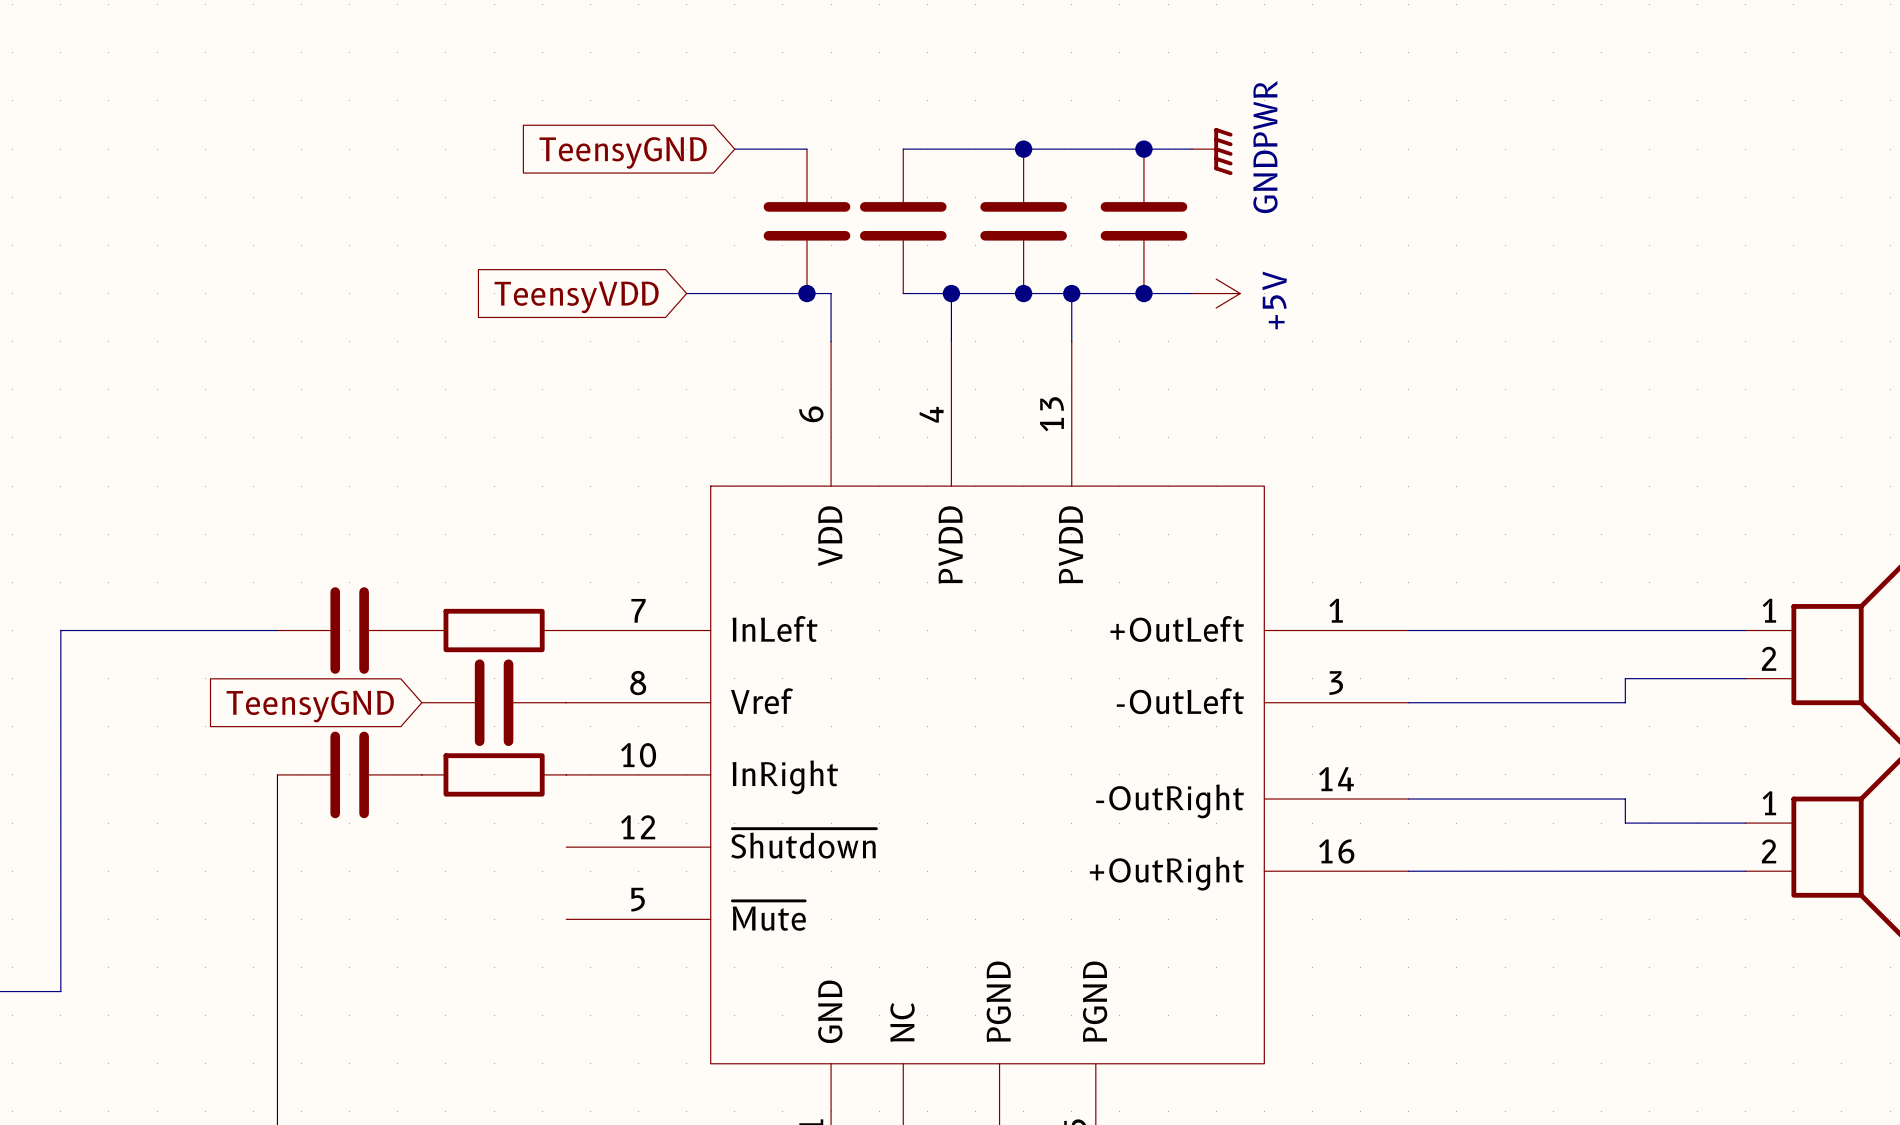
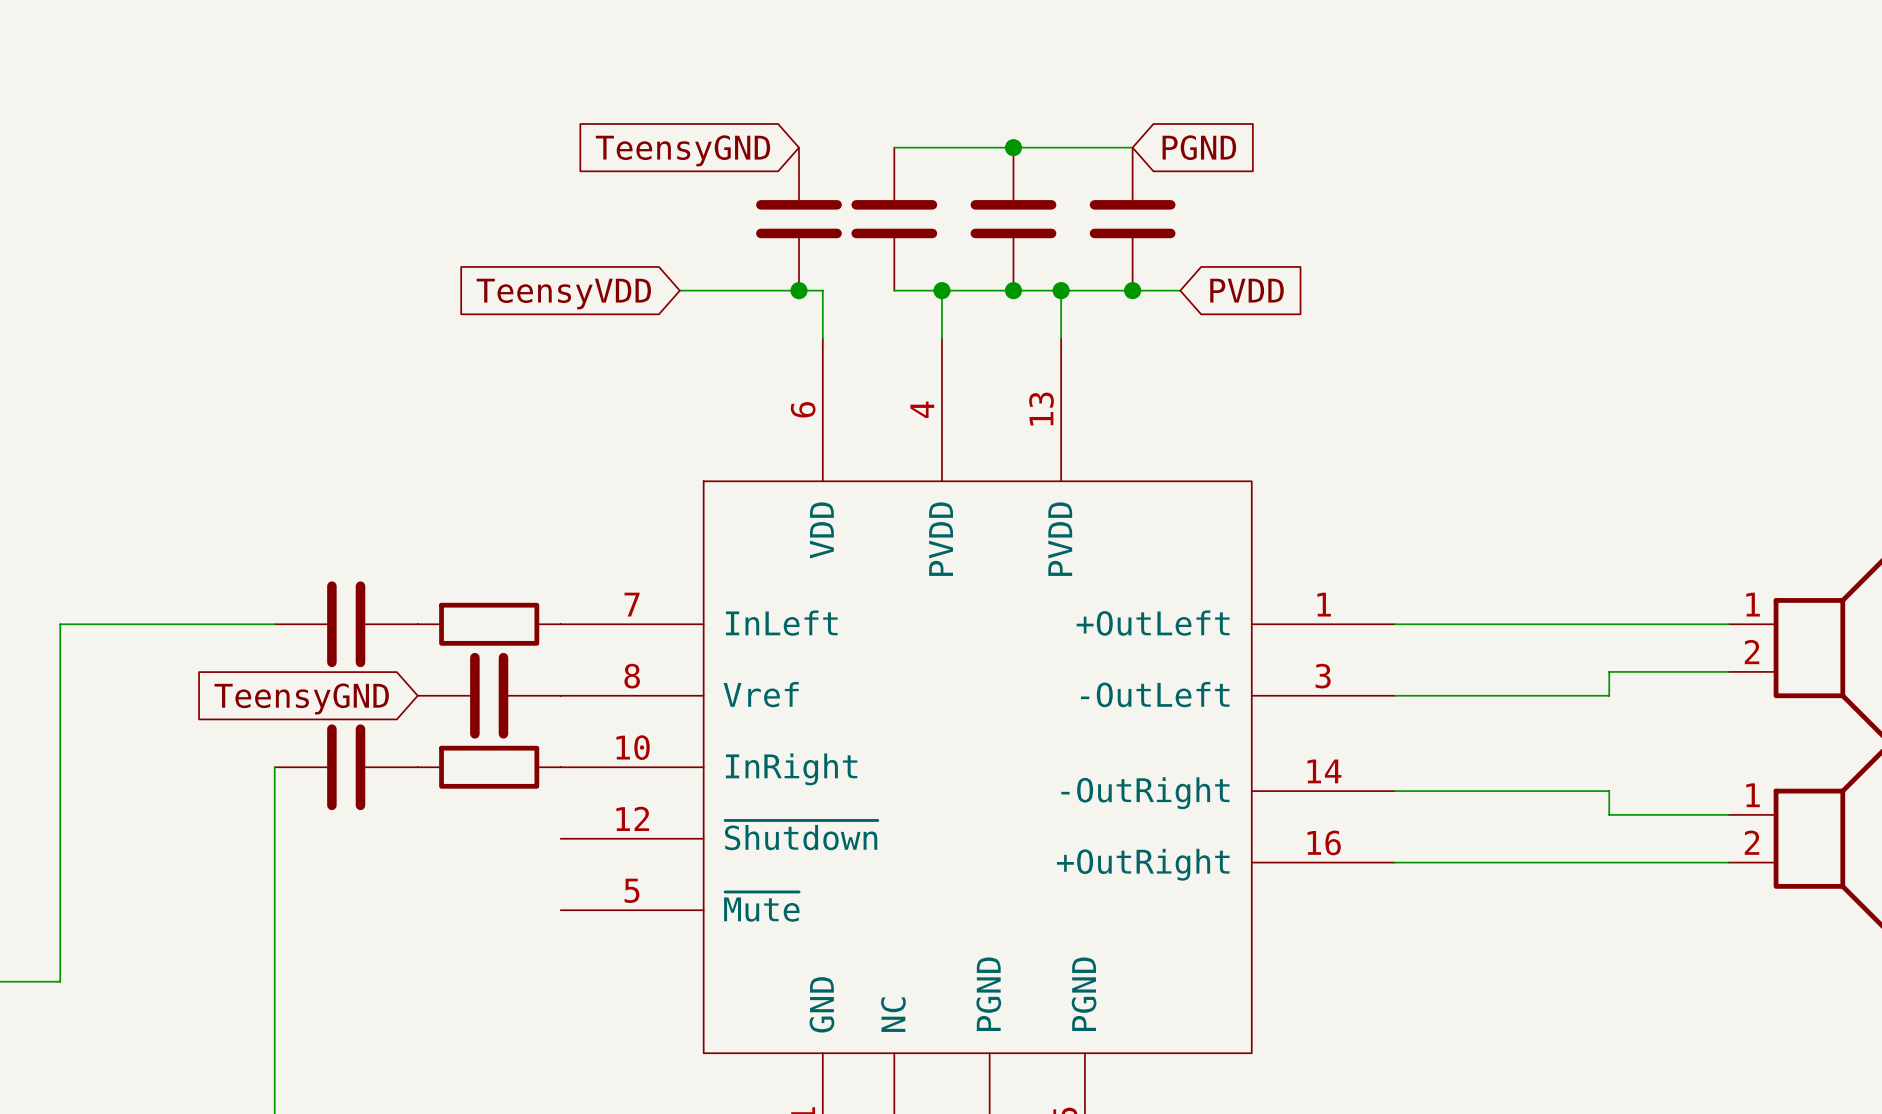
wire: (734, 149) (806, 149) -> none
wire: (1143, 149) (1192, 149) -> none
junction: (1143, 149) -> none
global label: none -> PGND (1199, 147)
power symbol: GNDPWR (1212, 151) -> none
global label position: TeensyGND (623, 152) -> TeensyGND (682, 150)
power symbol: +5V (1216, 293) -> none
global label: none -> PVDD (1247, 290)

